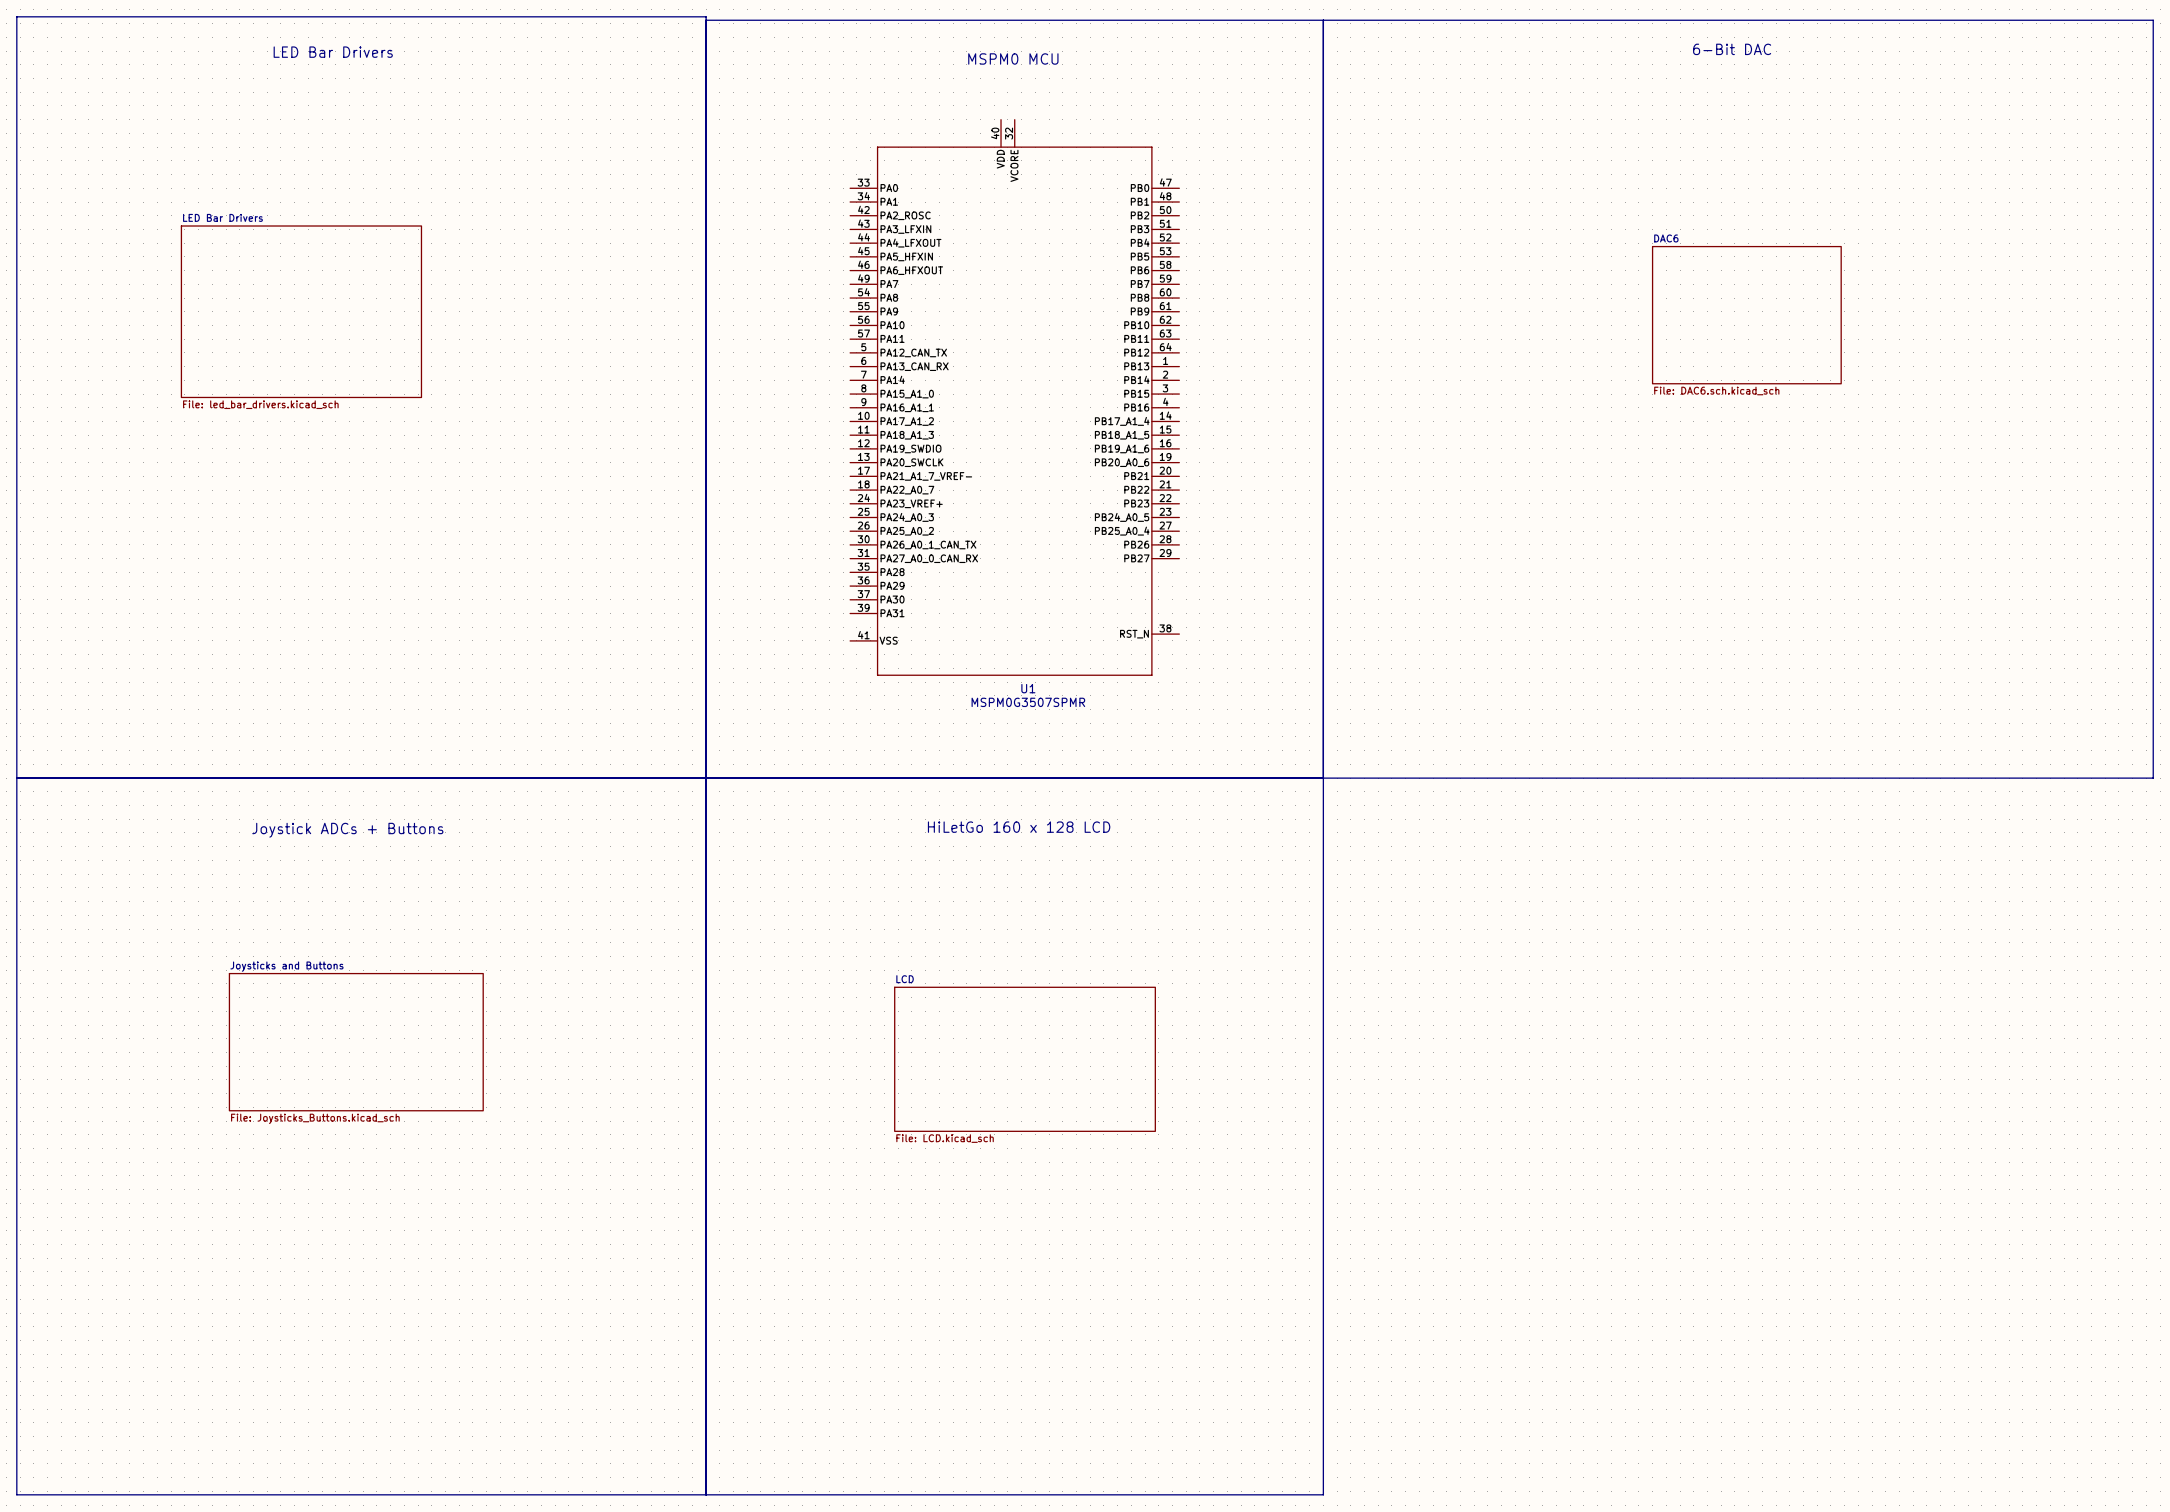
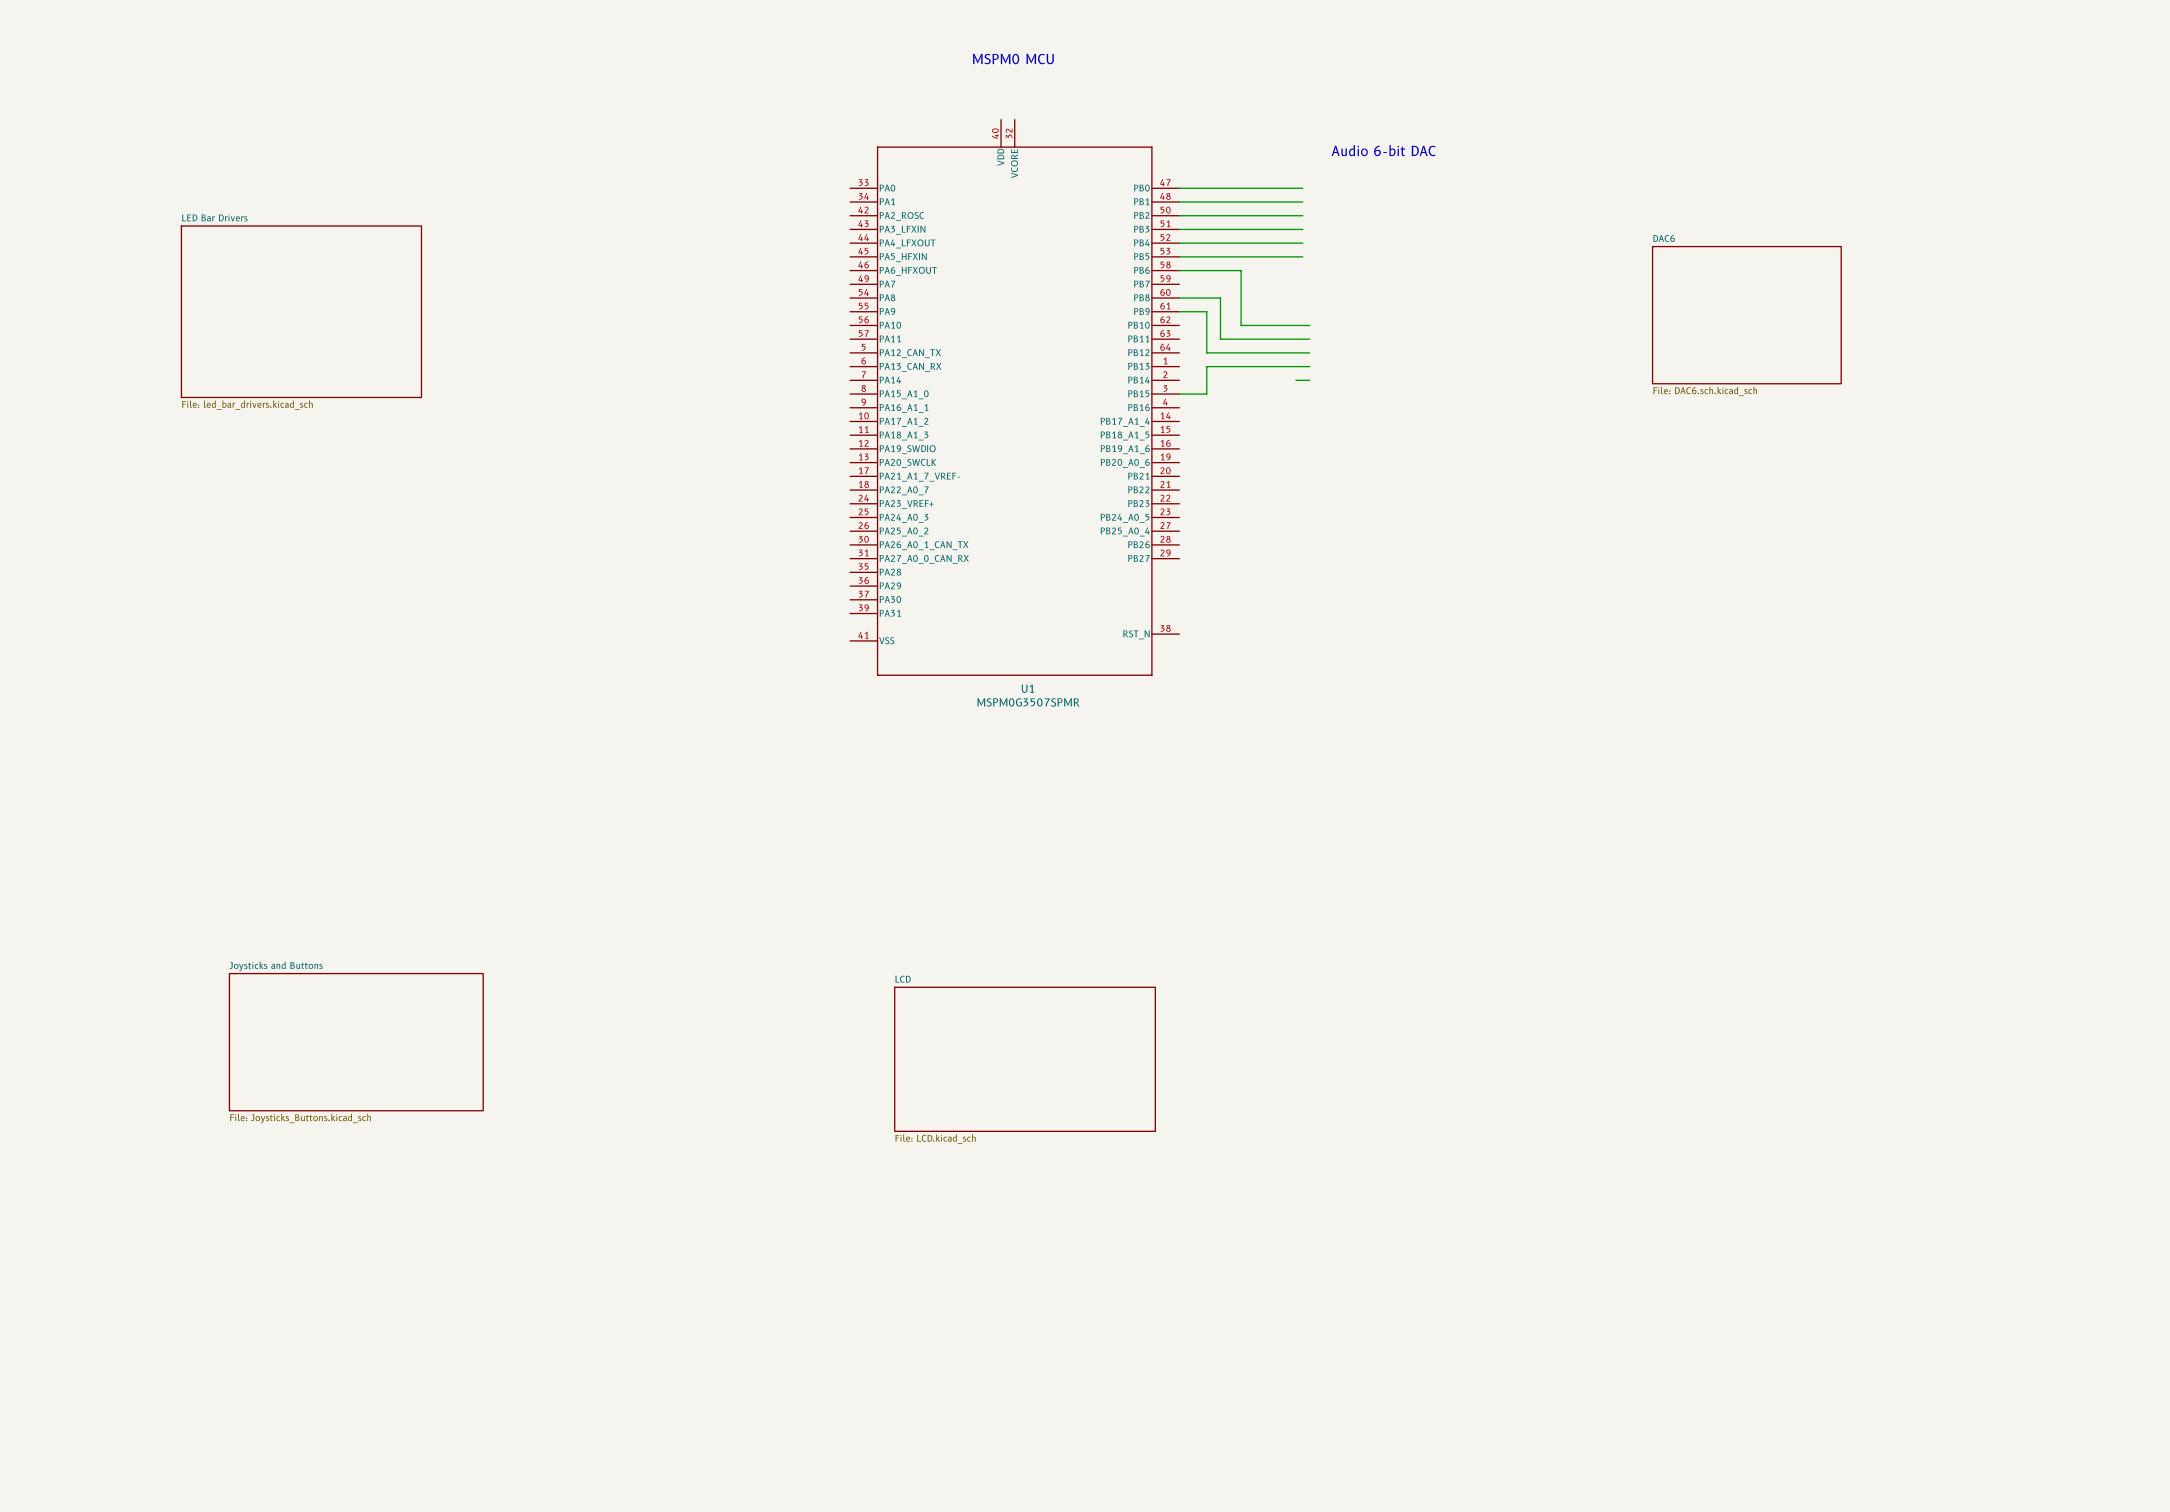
line: (706, 20) (2153, 20) (2153, 778) (16, 778) -> none
line: (1323, 20) (1323, 1494) (16, 1494) (16, 16) (706, 16) (706, 1494) -> none
text: 6-Bit DAC (1732, 49) -> none
text: LED Bar Drivers (333, 52) -> none
text: none -> Audio 6-bit DAC (1383, 150)
wire: none -> (1179, 188) (1302, 188)
wire: none -> (1179, 202) (1302, 202)
wire: none -> (1179, 215) (1302, 215)
wire: none -> (1179, 229) (1302, 229)
wire: none -> (1179, 243) (1302, 243)
wire: none -> (1179, 256) (1302, 256)
wire: none -> (1179, 270) (1241, 270) (1241, 325) (1309, 325)
wire: none -> (1179, 298) (1220, 298) (1220, 339) (1309, 339)
wire: none -> (1179, 311) (1206, 311) (1206, 352) (1309, 352)
wire: none -> (1309, 366) (1206, 366) (1206, 394) (1179, 394)
wire: none -> (1295, 380) (1309, 380)
text: HiLetGo 160 x 128 LCD (1019, 827) -> none
text: Joystick ADCs + Buttons (347, 830) -> none

